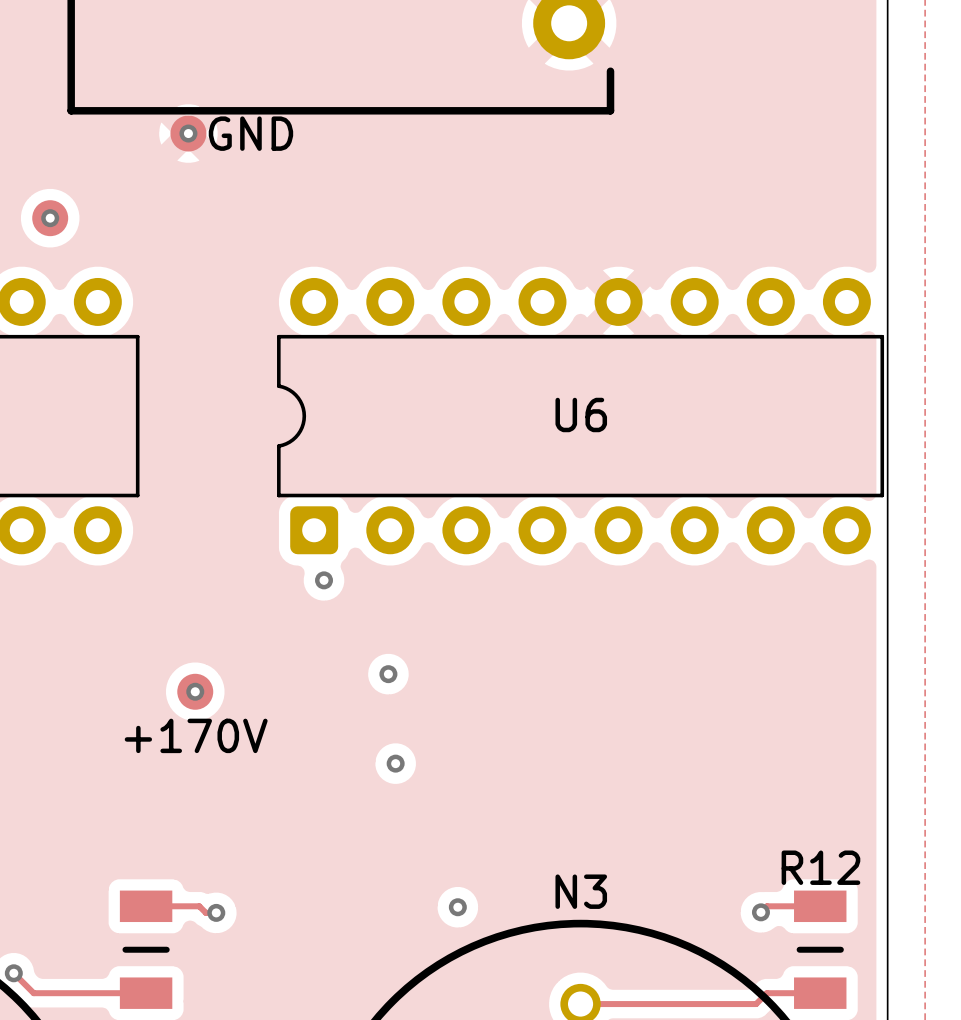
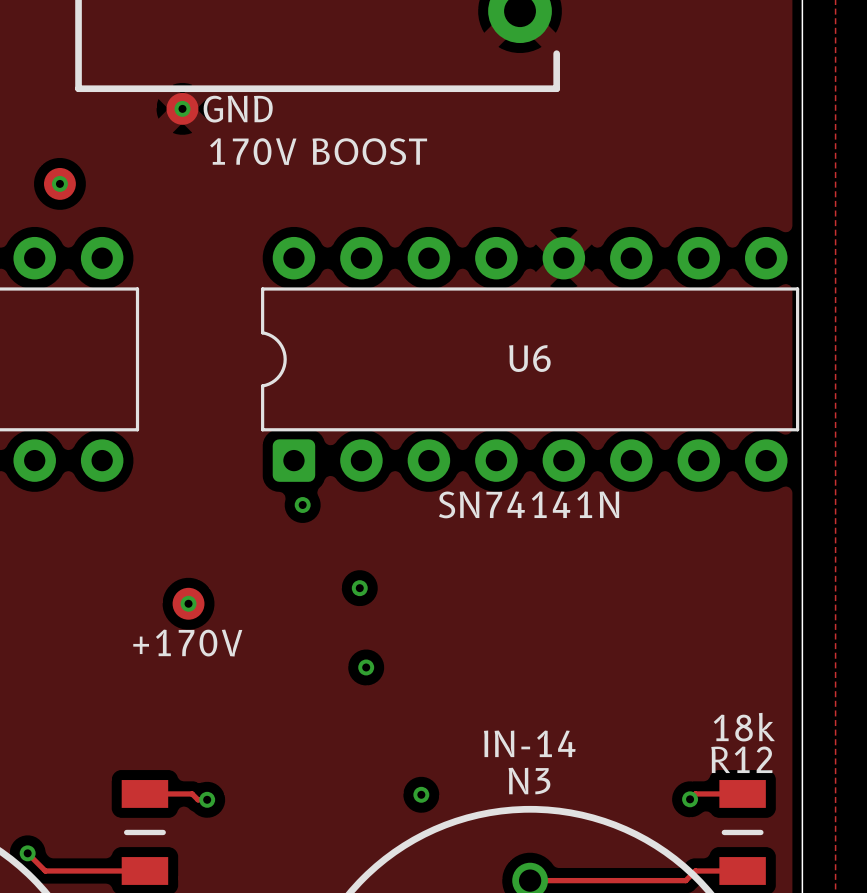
text: none -> 170V BOOST (318, 151)
U6 value: none -> SN74141N (529, 504)
R12 value: none -> 18k (744, 727)
N3 value: none -> IN-14 (529, 743)

